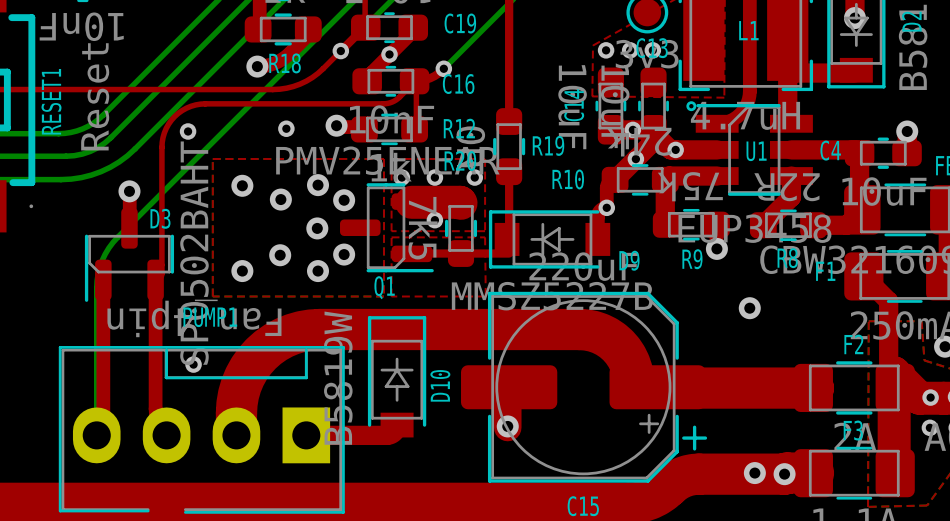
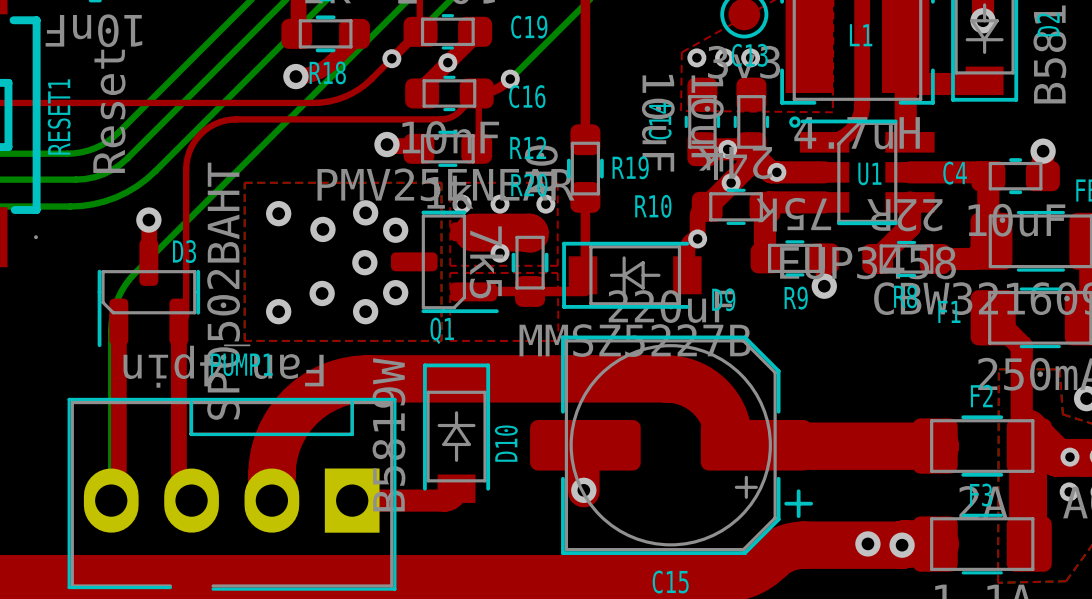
via: (286, 128) -> none
via: (188, 131) -> none
via: (749, 308) -> none
via: (193, 364) -> none

